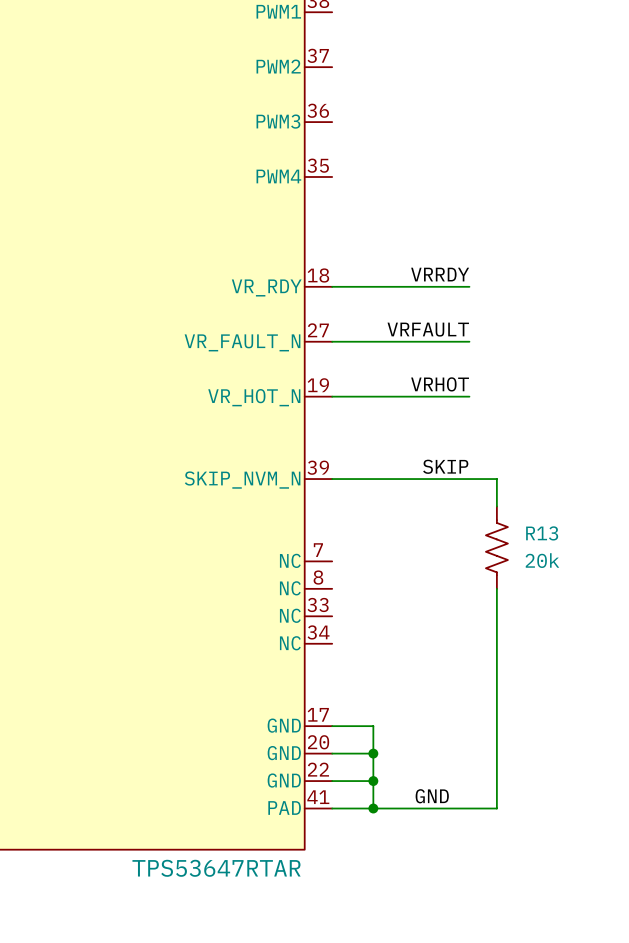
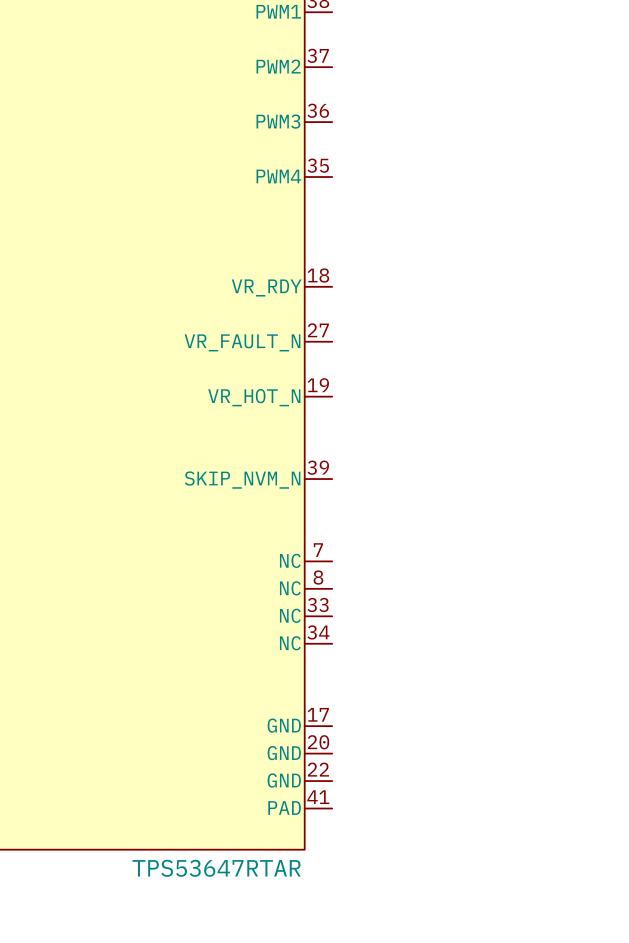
label: VRRDY (440, 274) -> none
wire: (332, 286) (469, 286) -> none
label: VRFAULT (428, 329) -> none
wire: (332, 341) (469, 341) -> none
label: VRHOT (440, 384) -> none
wire: (332, 396) (469, 396) -> none
label: SKIP (445, 466) -> none
wire: (332, 479) (496, 479) (496, 506) -> none
R13: 20k (496, 547) -> none
wire: (496, 588) (496, 808) (332, 808) -> none
wire: (332, 726) (373, 726) (373, 808) -> none
wire: (332, 753) (373, 753) -> none
junction: (373, 753) -> none
wire: (332, 781) (373, 781) -> none
junction: (373, 781) -> none
label: GND (432, 796) -> none
junction: (373, 808) -> none

